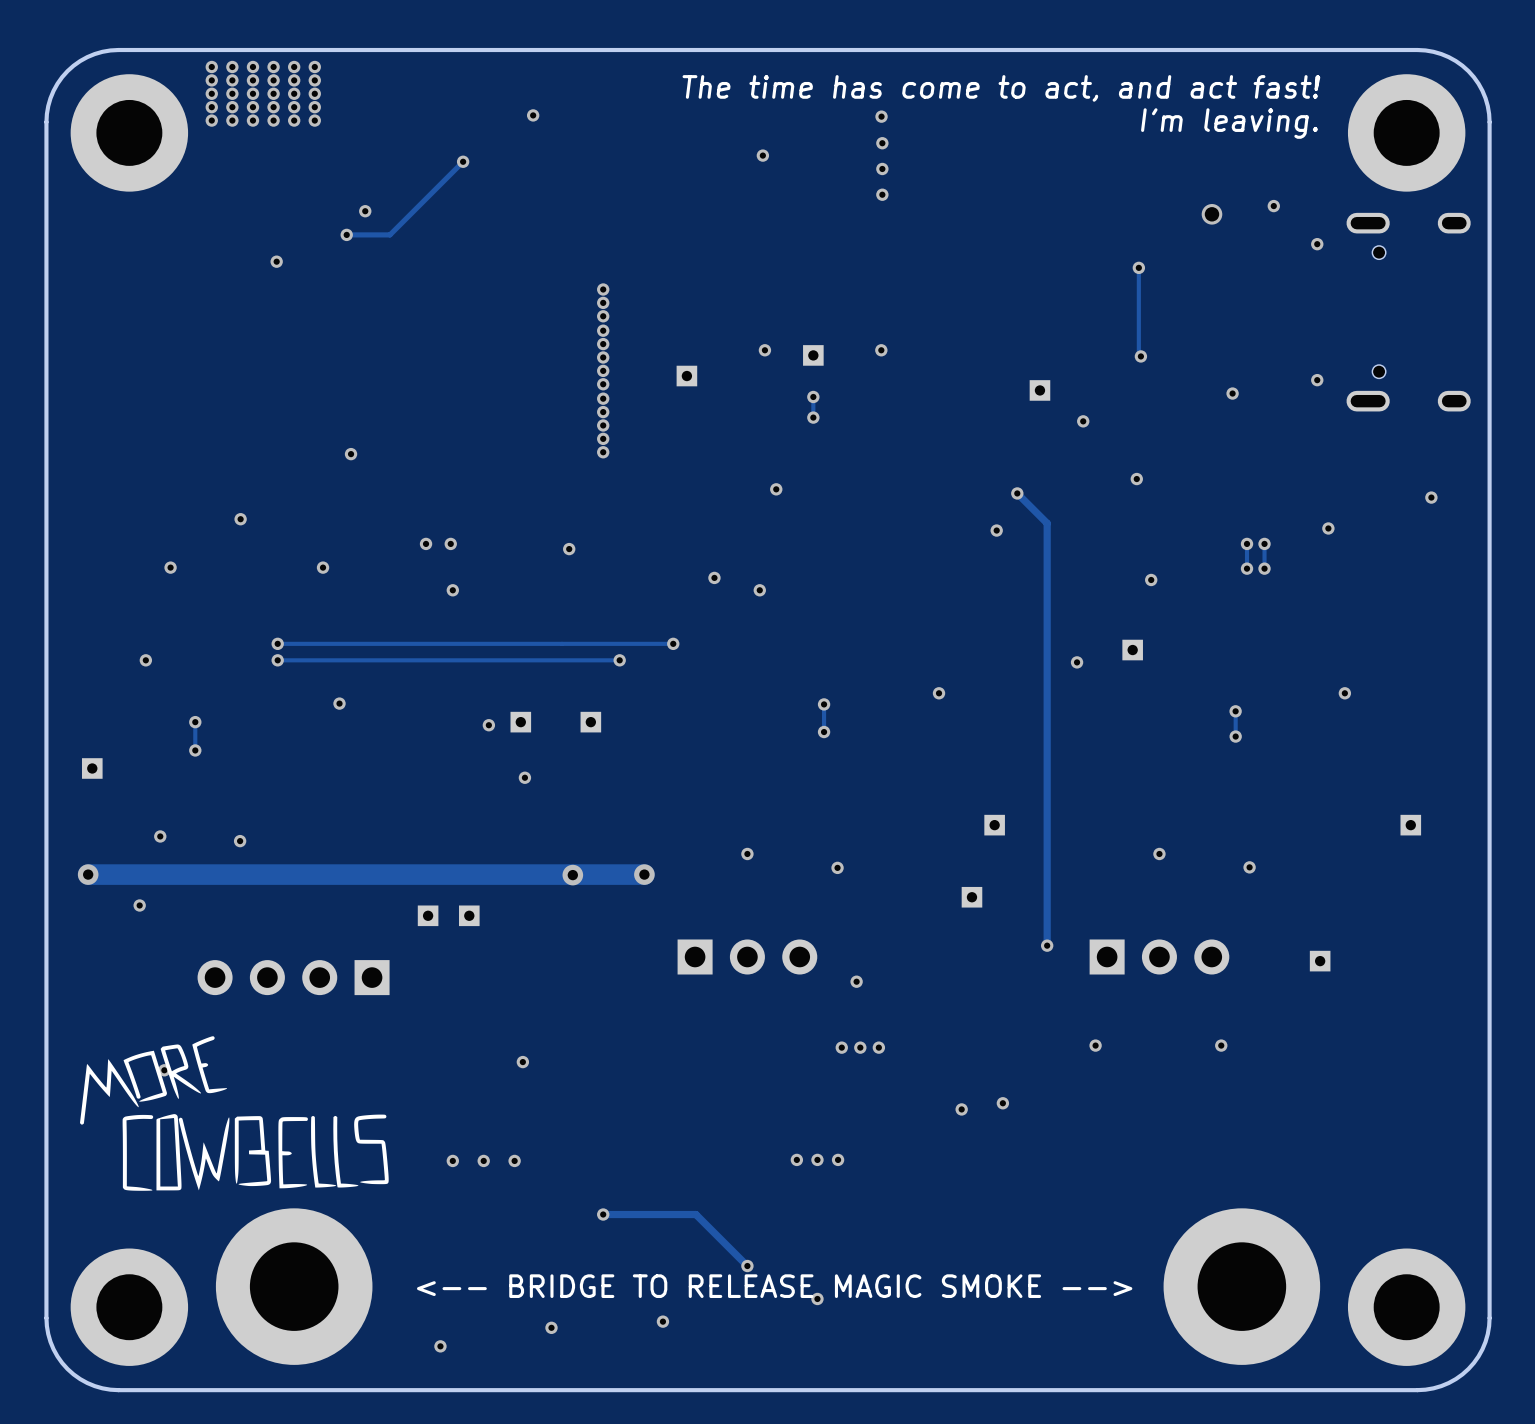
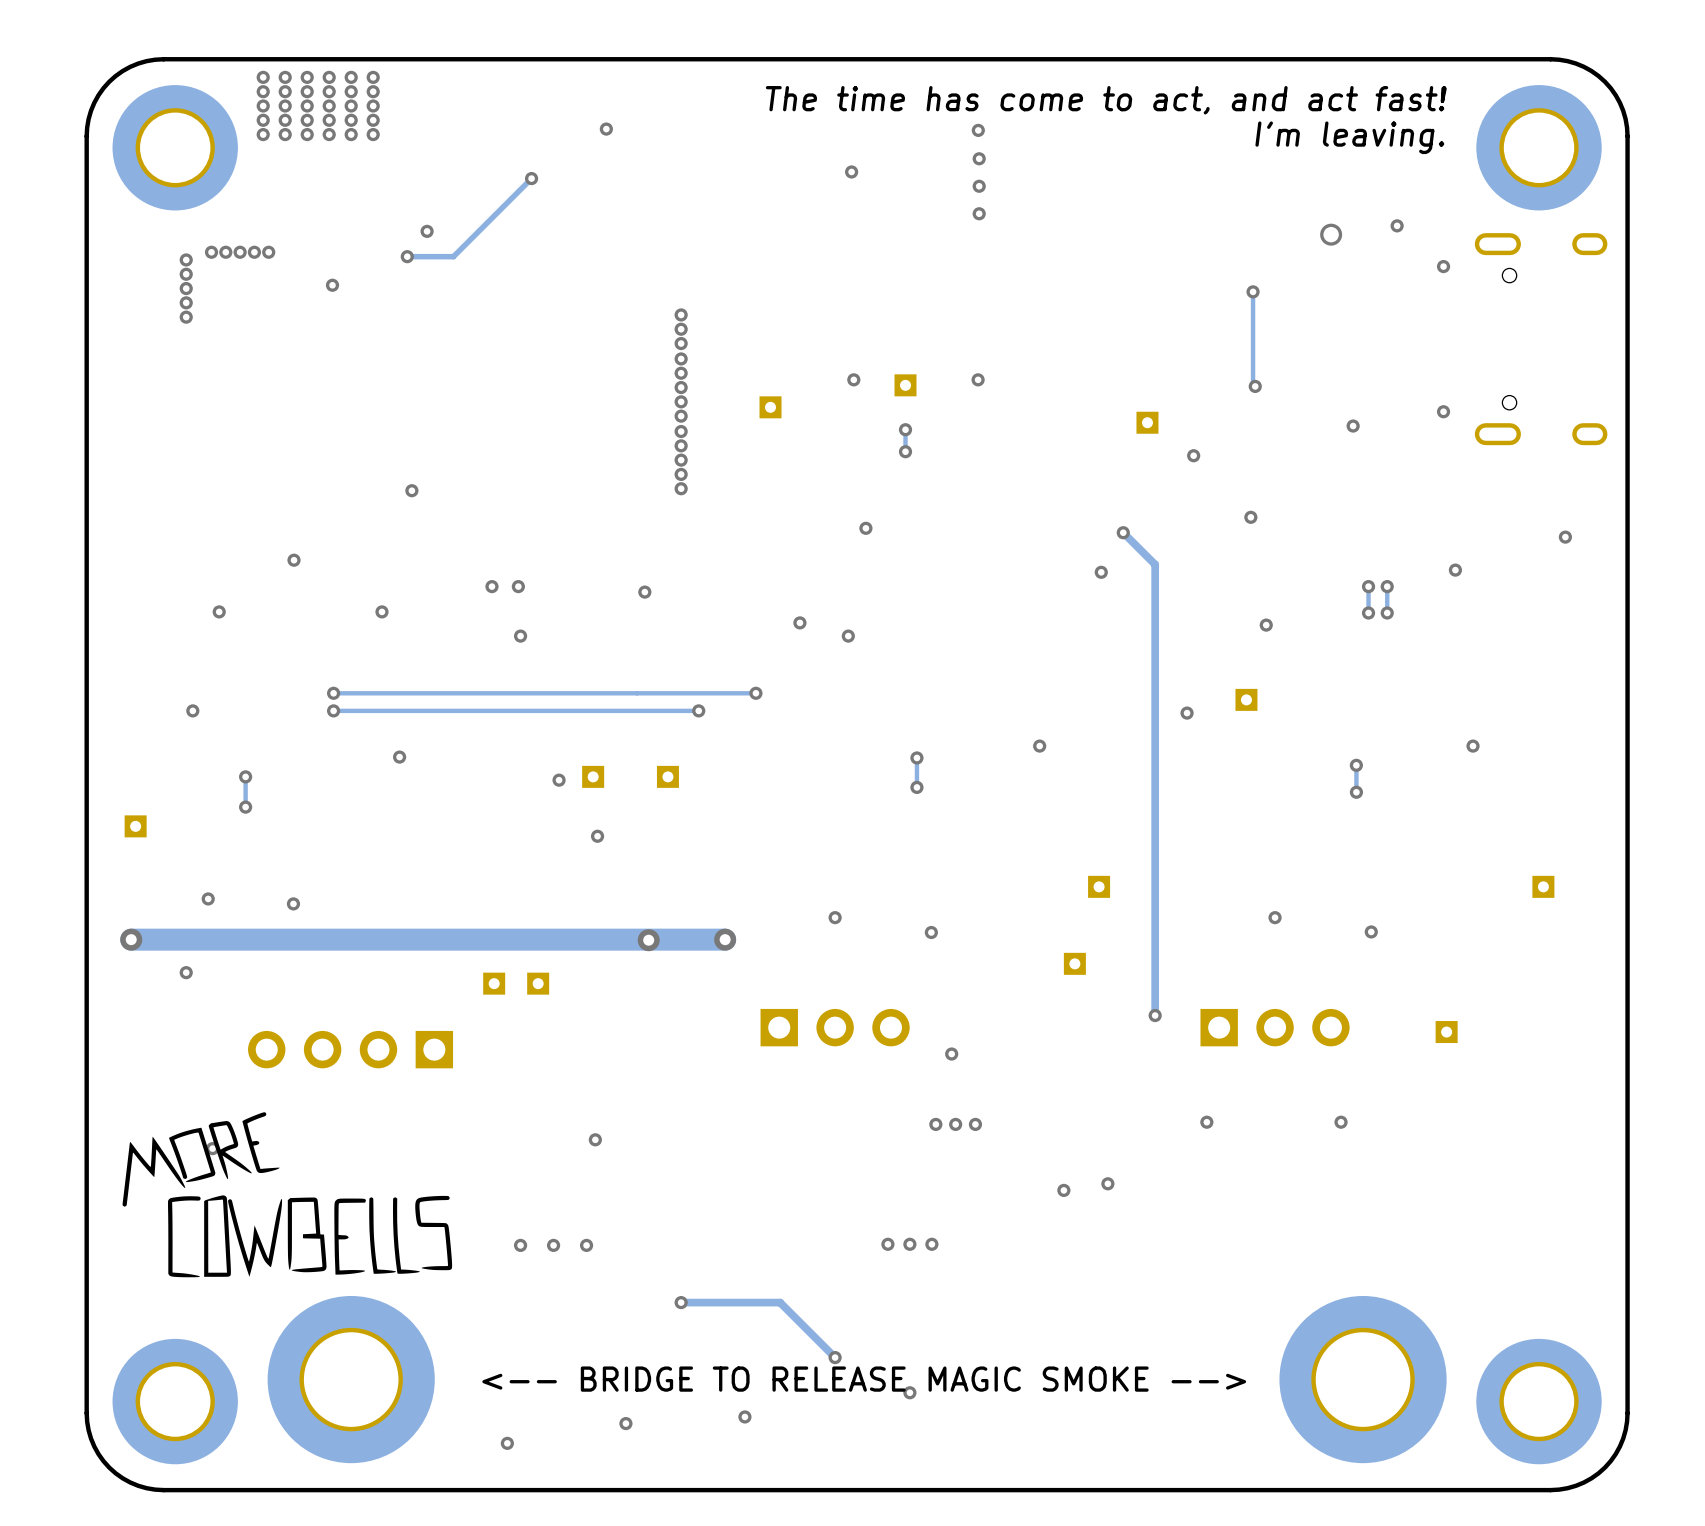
via: none -> (211, 252)
via: none -> (225, 252)
via: none -> (240, 252)
via: none -> (254, 252)
via: none -> (268, 252)
via: none -> (186, 259)
via: none -> (186, 274)
via: none -> (186, 288)
via: none -> (186, 302)
via: none -> (186, 317)

